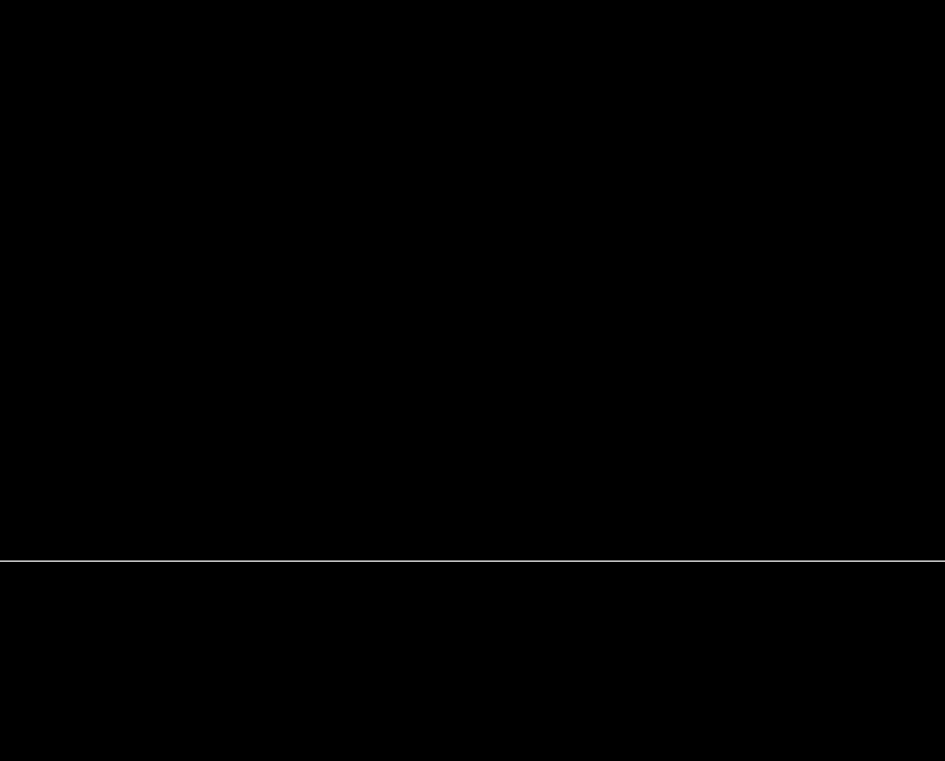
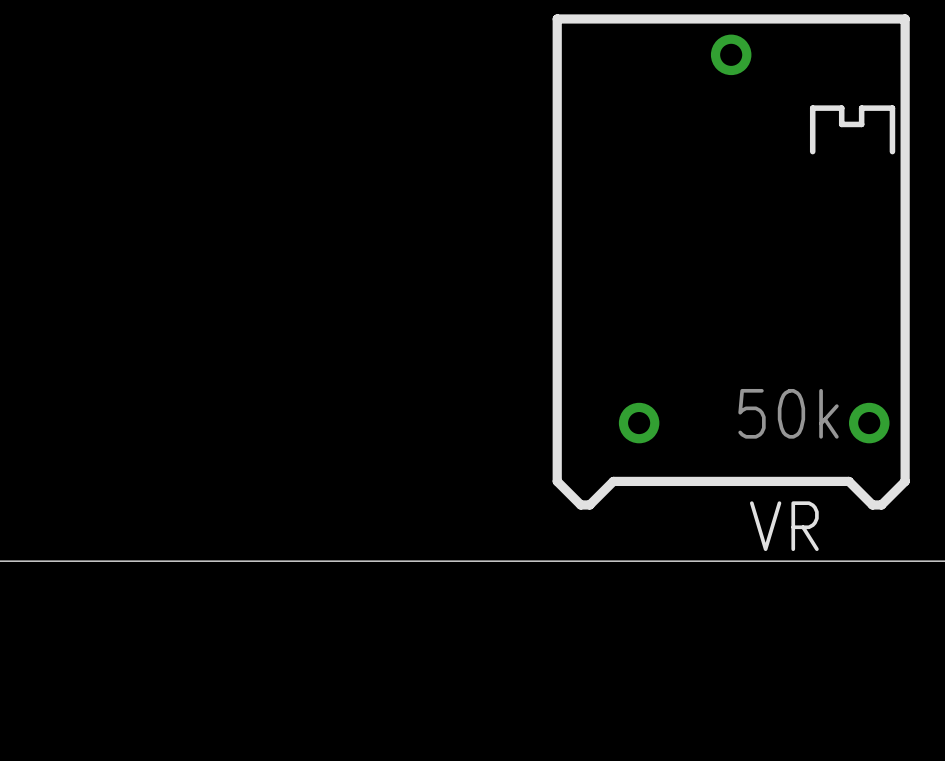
VR: none -> 50k (731, 261)

